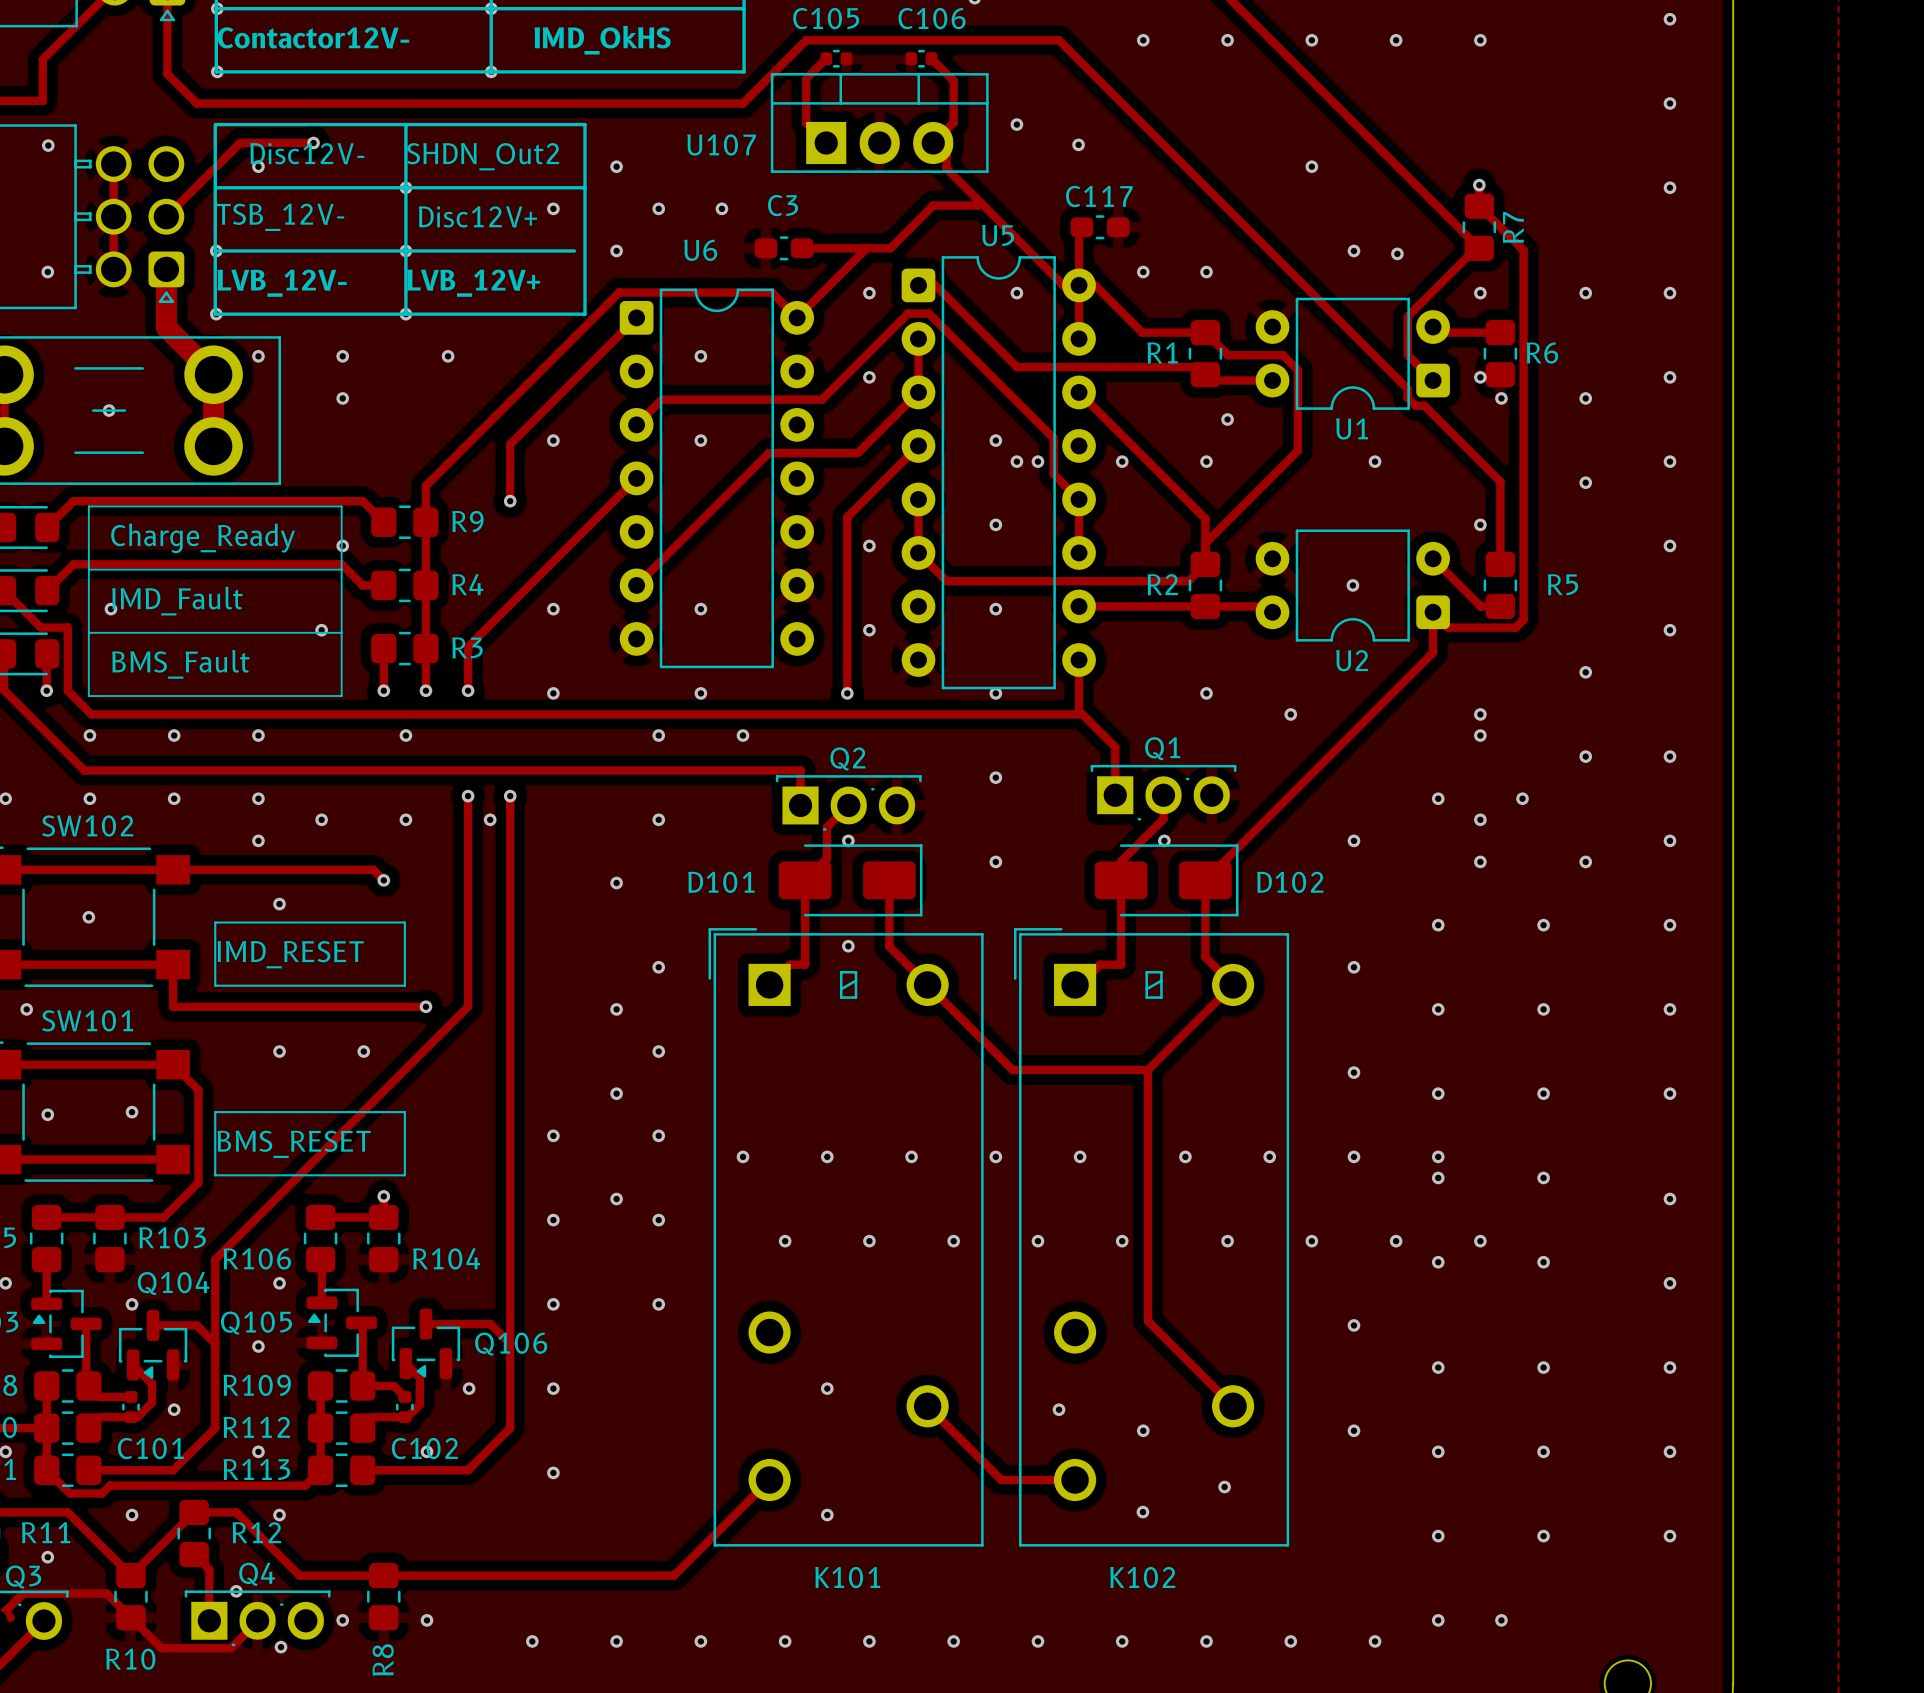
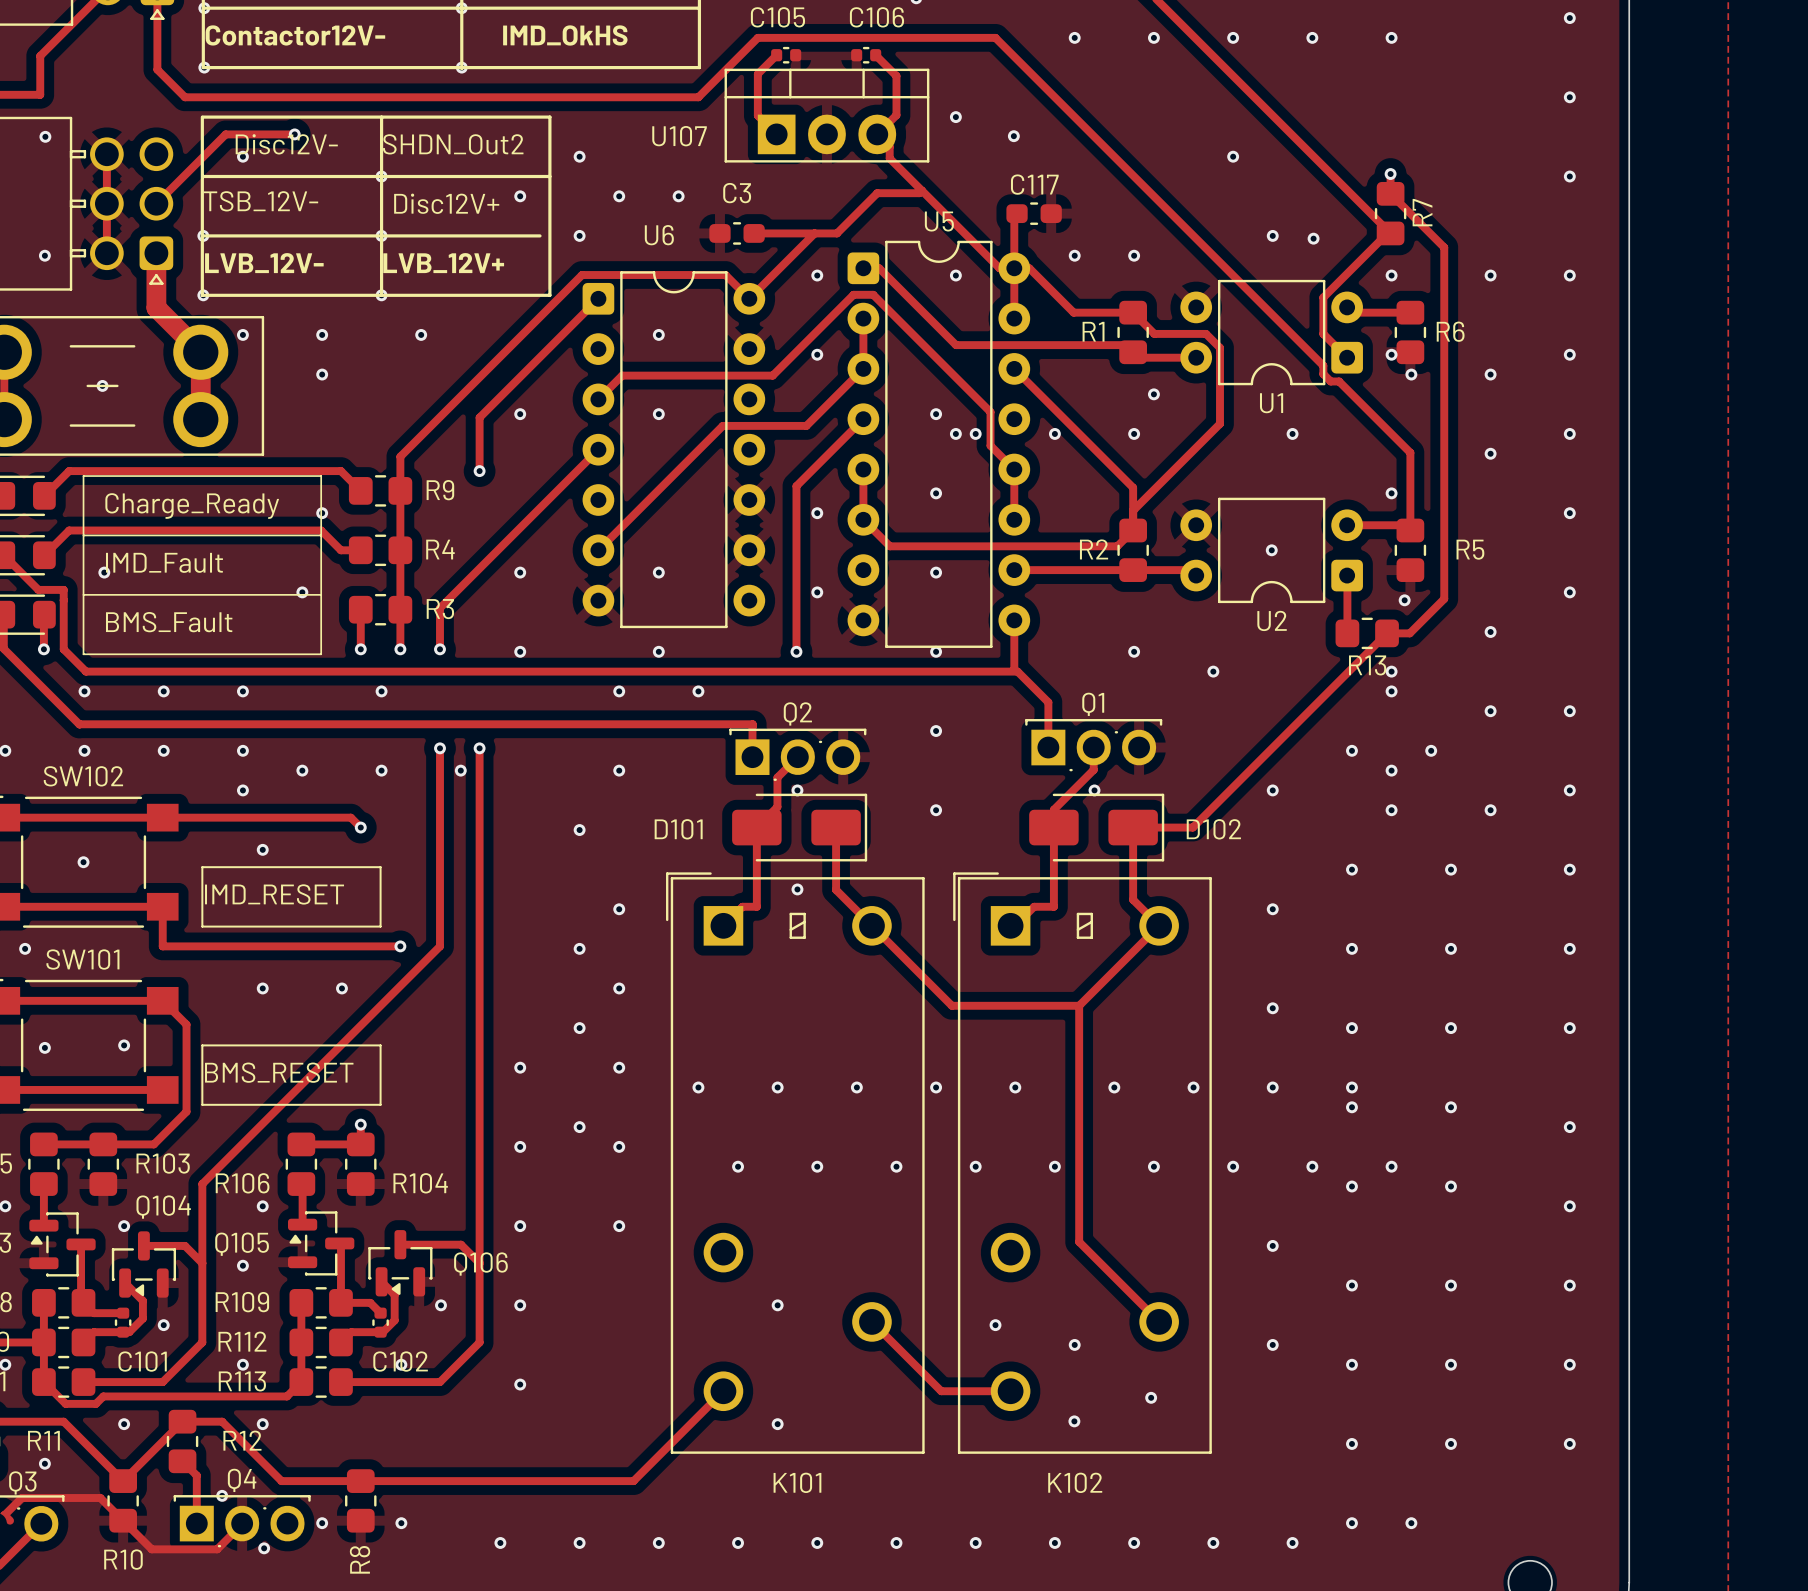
track: (1523, 250) (1523, 619) (1515, 627) (1448, 627) (1433, 612) -> (1432, 235) (1444, 247) (1444, 598) (1409, 633) (1387, 633) (1192, 827) (1133, 827)
track: (1433, 558) (1480, 606) (1500, 606) -> (1347, 525) (1405, 525) (1410, 530)
track: (1433, 612) (1433, 652) (1205, 880) -> (1347, 575) (1347, 633)
via: none -> (1404, 600)
R13: none -> (1367, 633)

